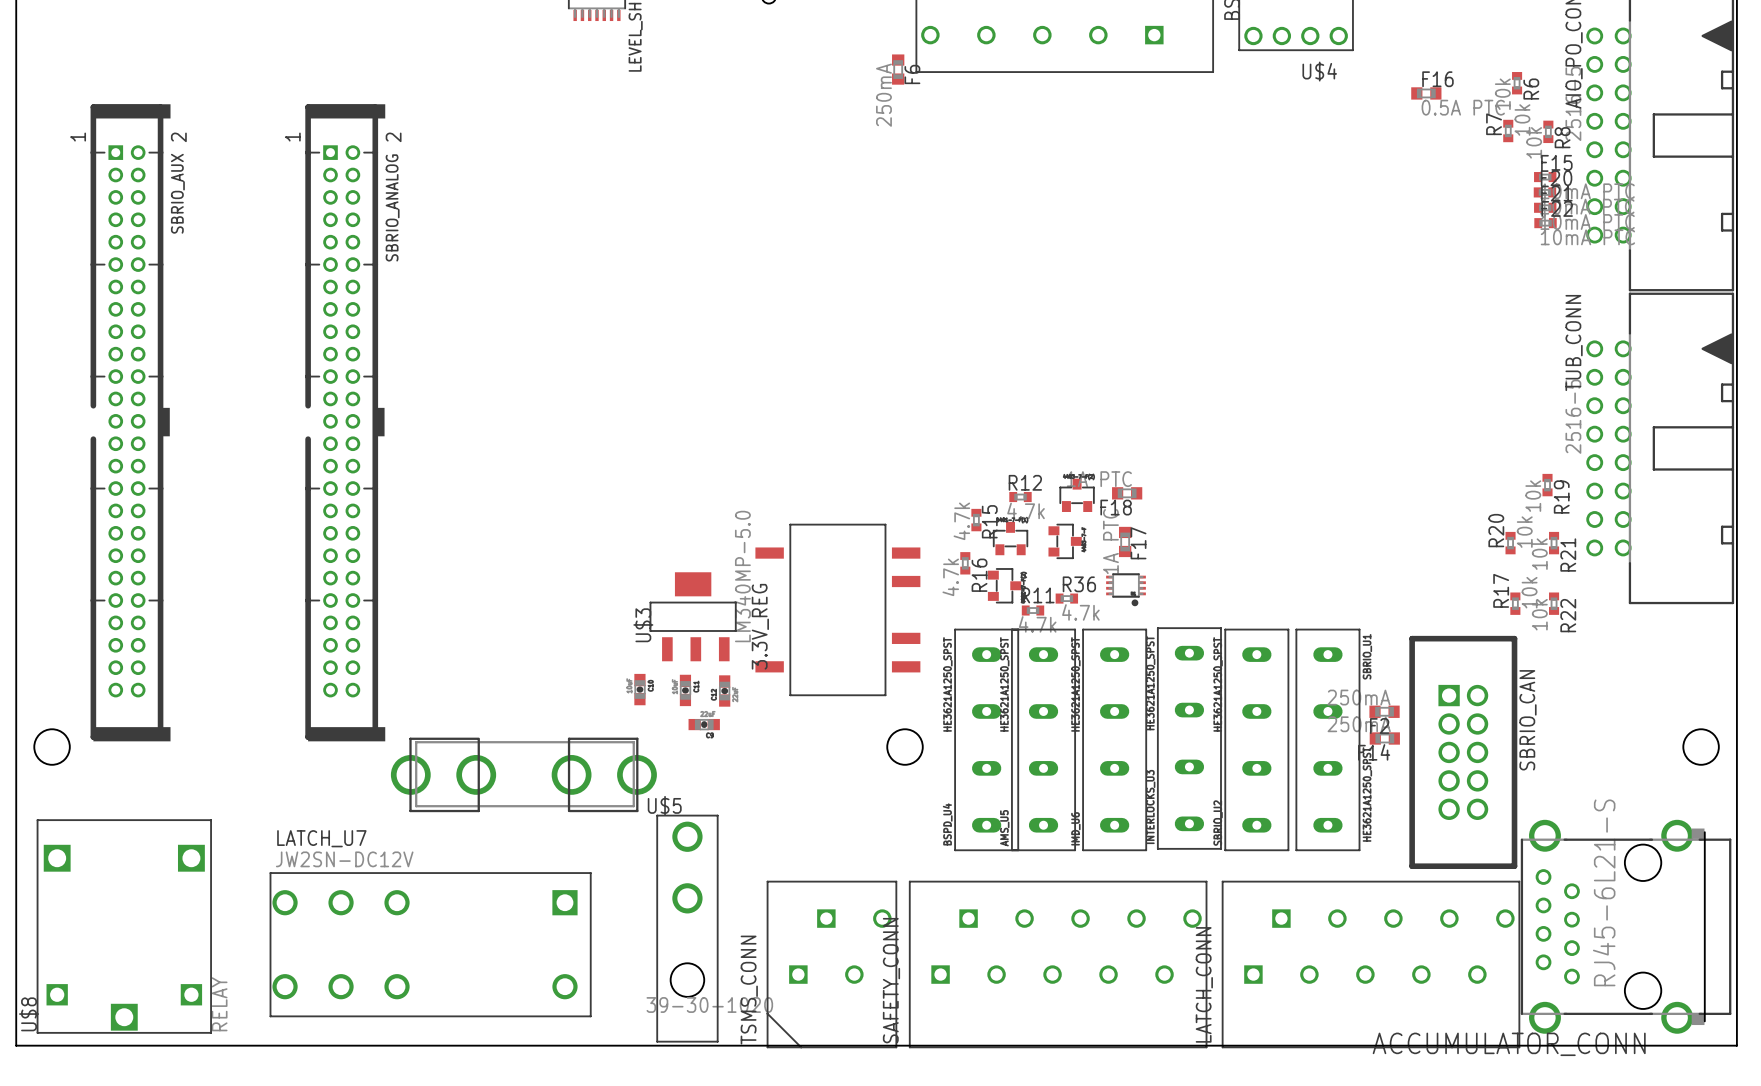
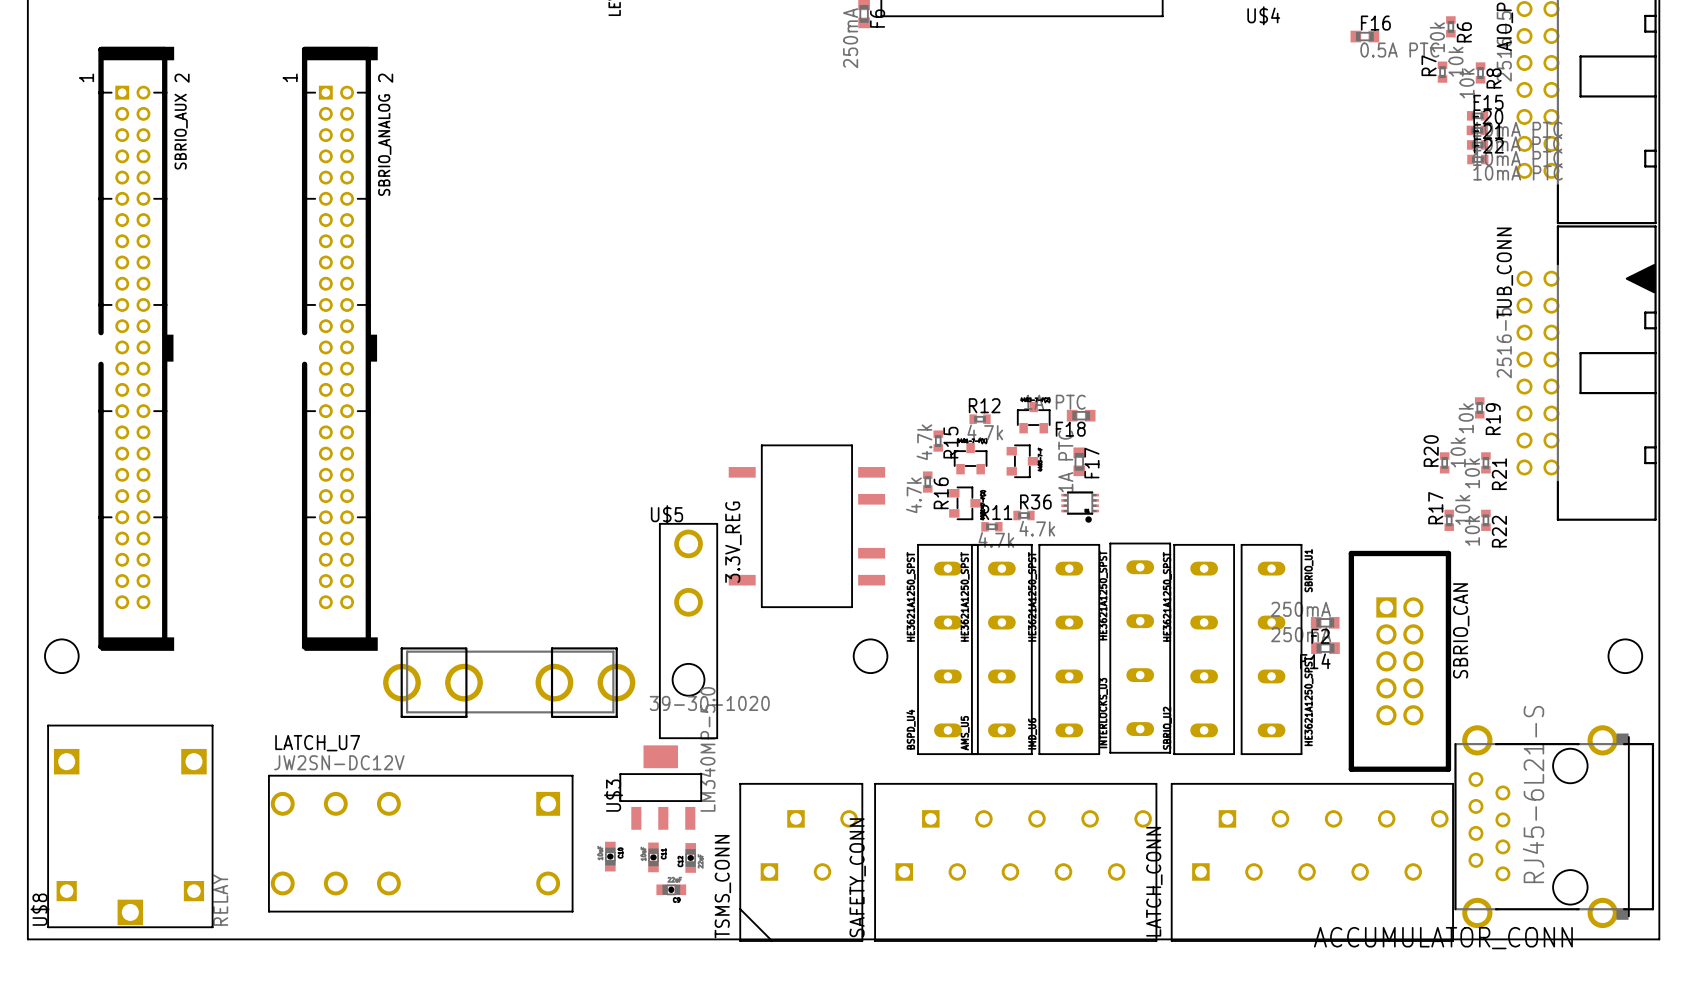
U$3 position: (693, 616) -> (660, 787)
part position: (639, 689) -> (610, 856)
part position: (685, 690) -> (653, 857)
part position: (724, 691) -> (690, 857)
part position: (704, 724) -> (671, 889)
U$5 position: (687, 928) -> (688, 631)

